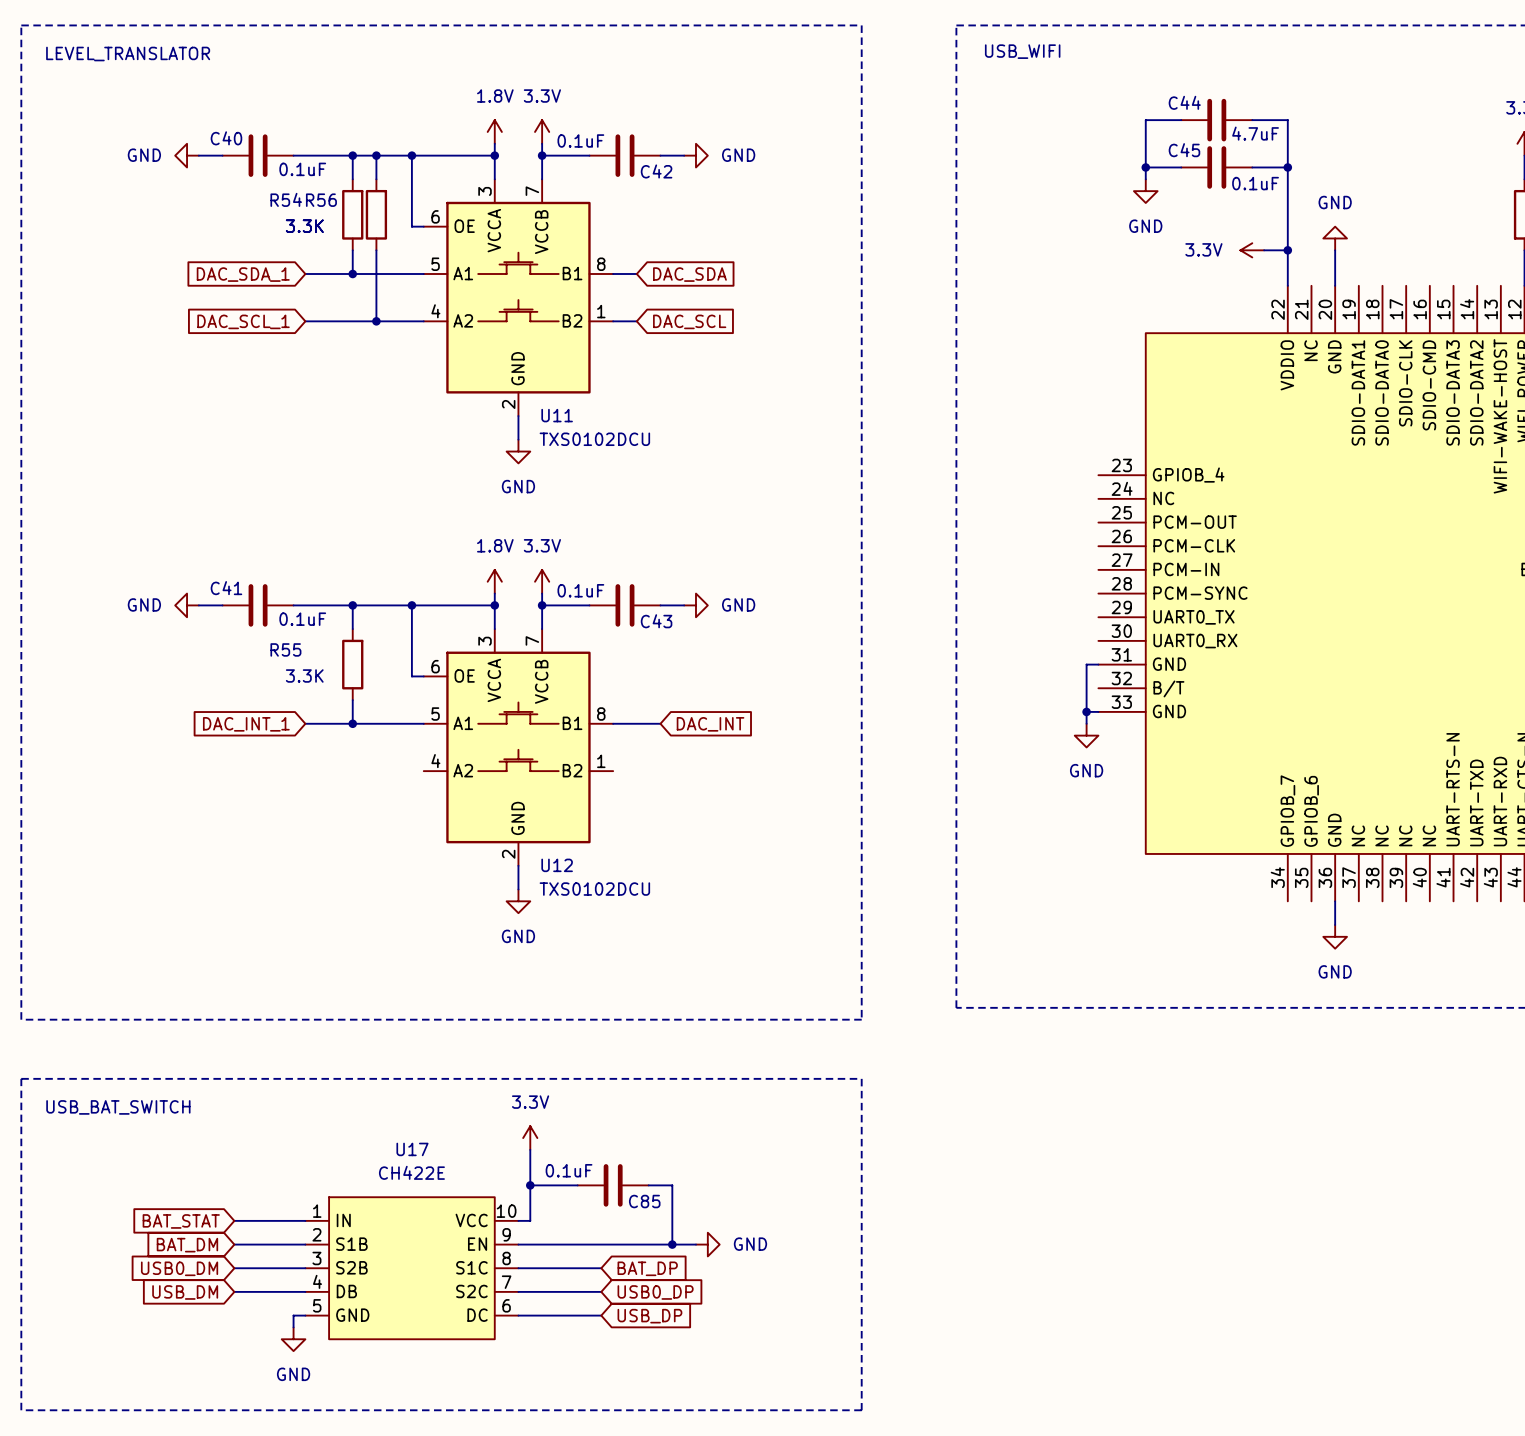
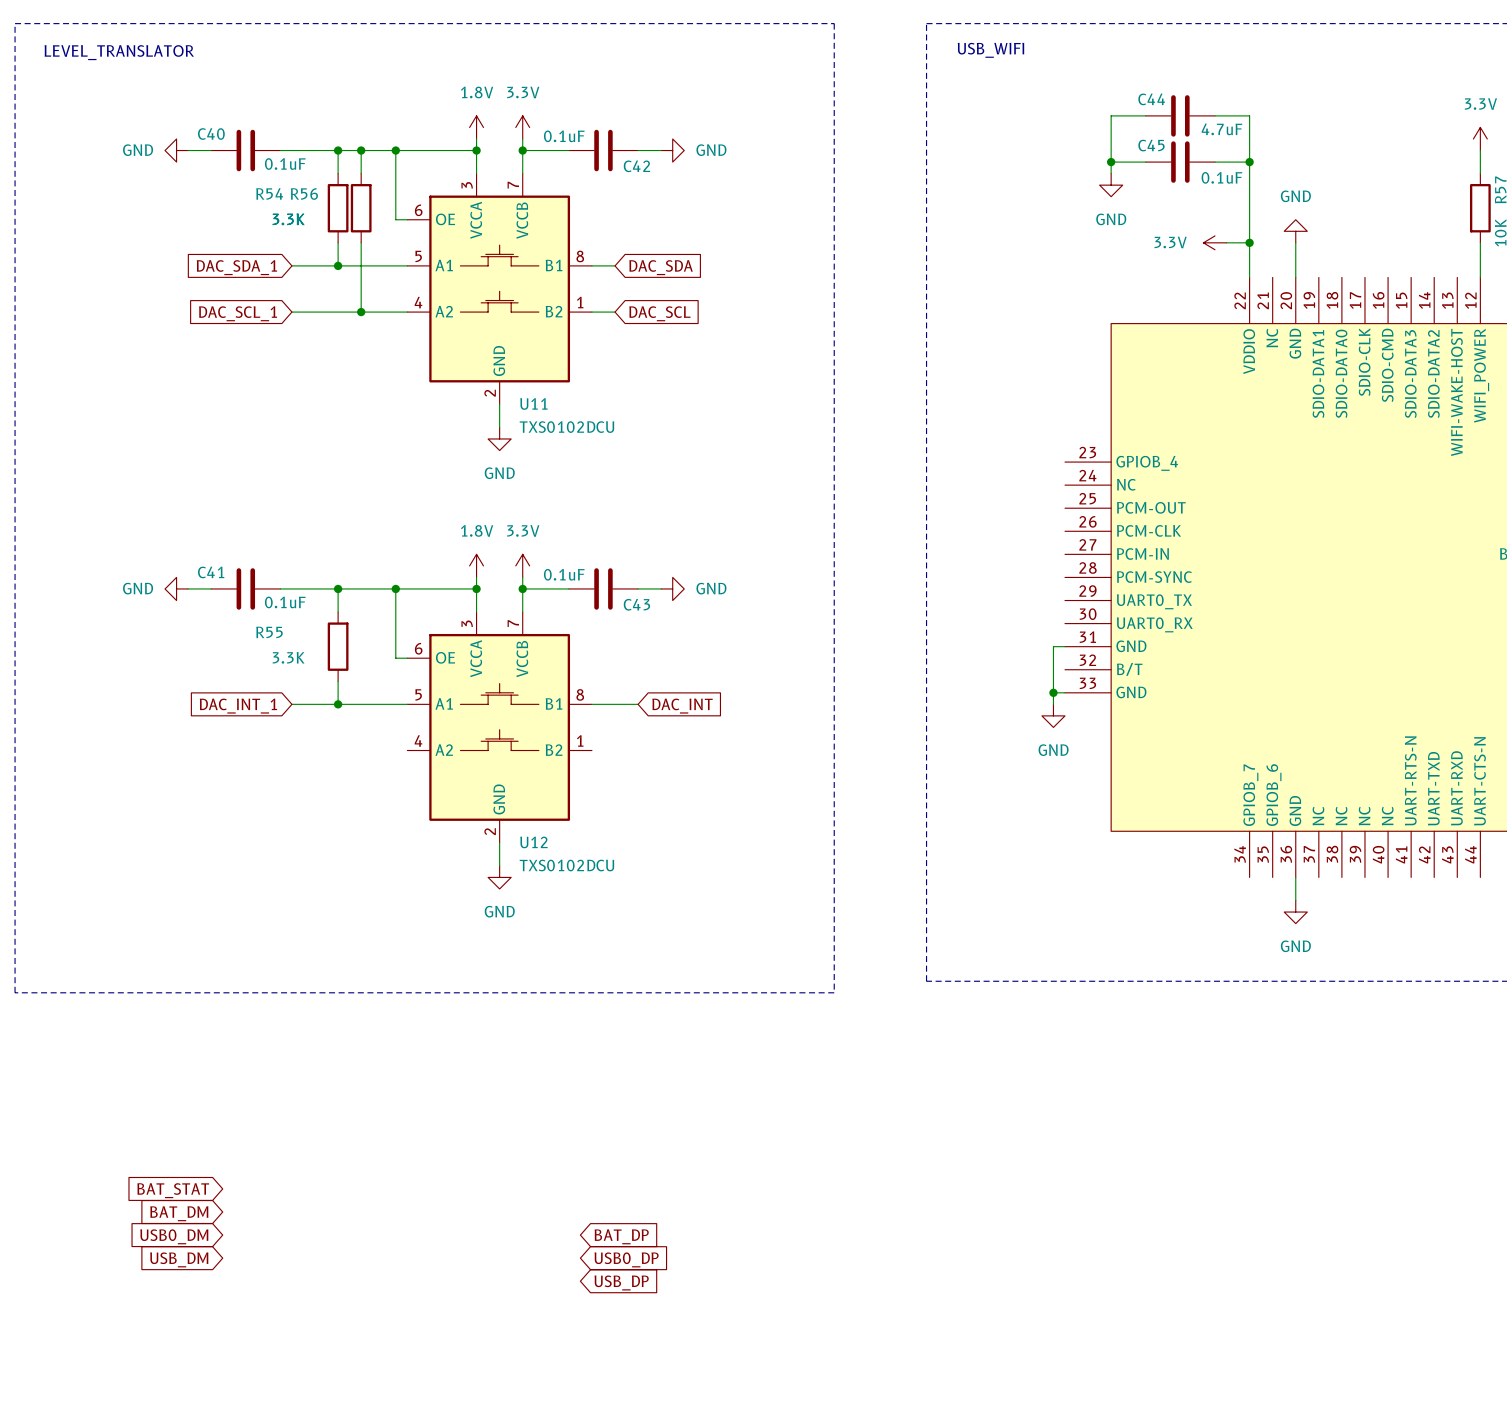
line: (21, 1078) (861, 1078) (861, 1410) (21, 1410) (21, 1078) -> none
text: USB_BAT_SWITCH (118, 1107) -> none
power symbol: 3.3V (530, 1138) -> none
wire: (530, 1149) (530, 1220) (518, 1220) -> none
wire: (530, 1185) (577, 1185) -> none
junction: (530, 1185) -> none
C85: 0.1uF (613, 1185) -> none
wire: (648, 1185) (672, 1185) (672, 1244) -> none
wire: (234, 1220) (305, 1220) -> none
wire: (234, 1244) (305, 1244) -> none
wire: (518, 1244) (695, 1244) -> none
junction: (672, 1244) -> none
power symbol: GND (707, 1244) -> none
wire: (234, 1268) (305, 1268) -> none
U17: CH422E (411, 1268) -> none
wire: (518, 1268) (601, 1268) -> none
wire: (234, 1291) (305, 1291) -> none
wire: (518, 1291) (601, 1291) -> none
wire: (305, 1315) (293, 1315) (293, 1327) -> none
wire: (518, 1315) (601, 1315) -> none
power symbol: GND (293, 1339) -> none

